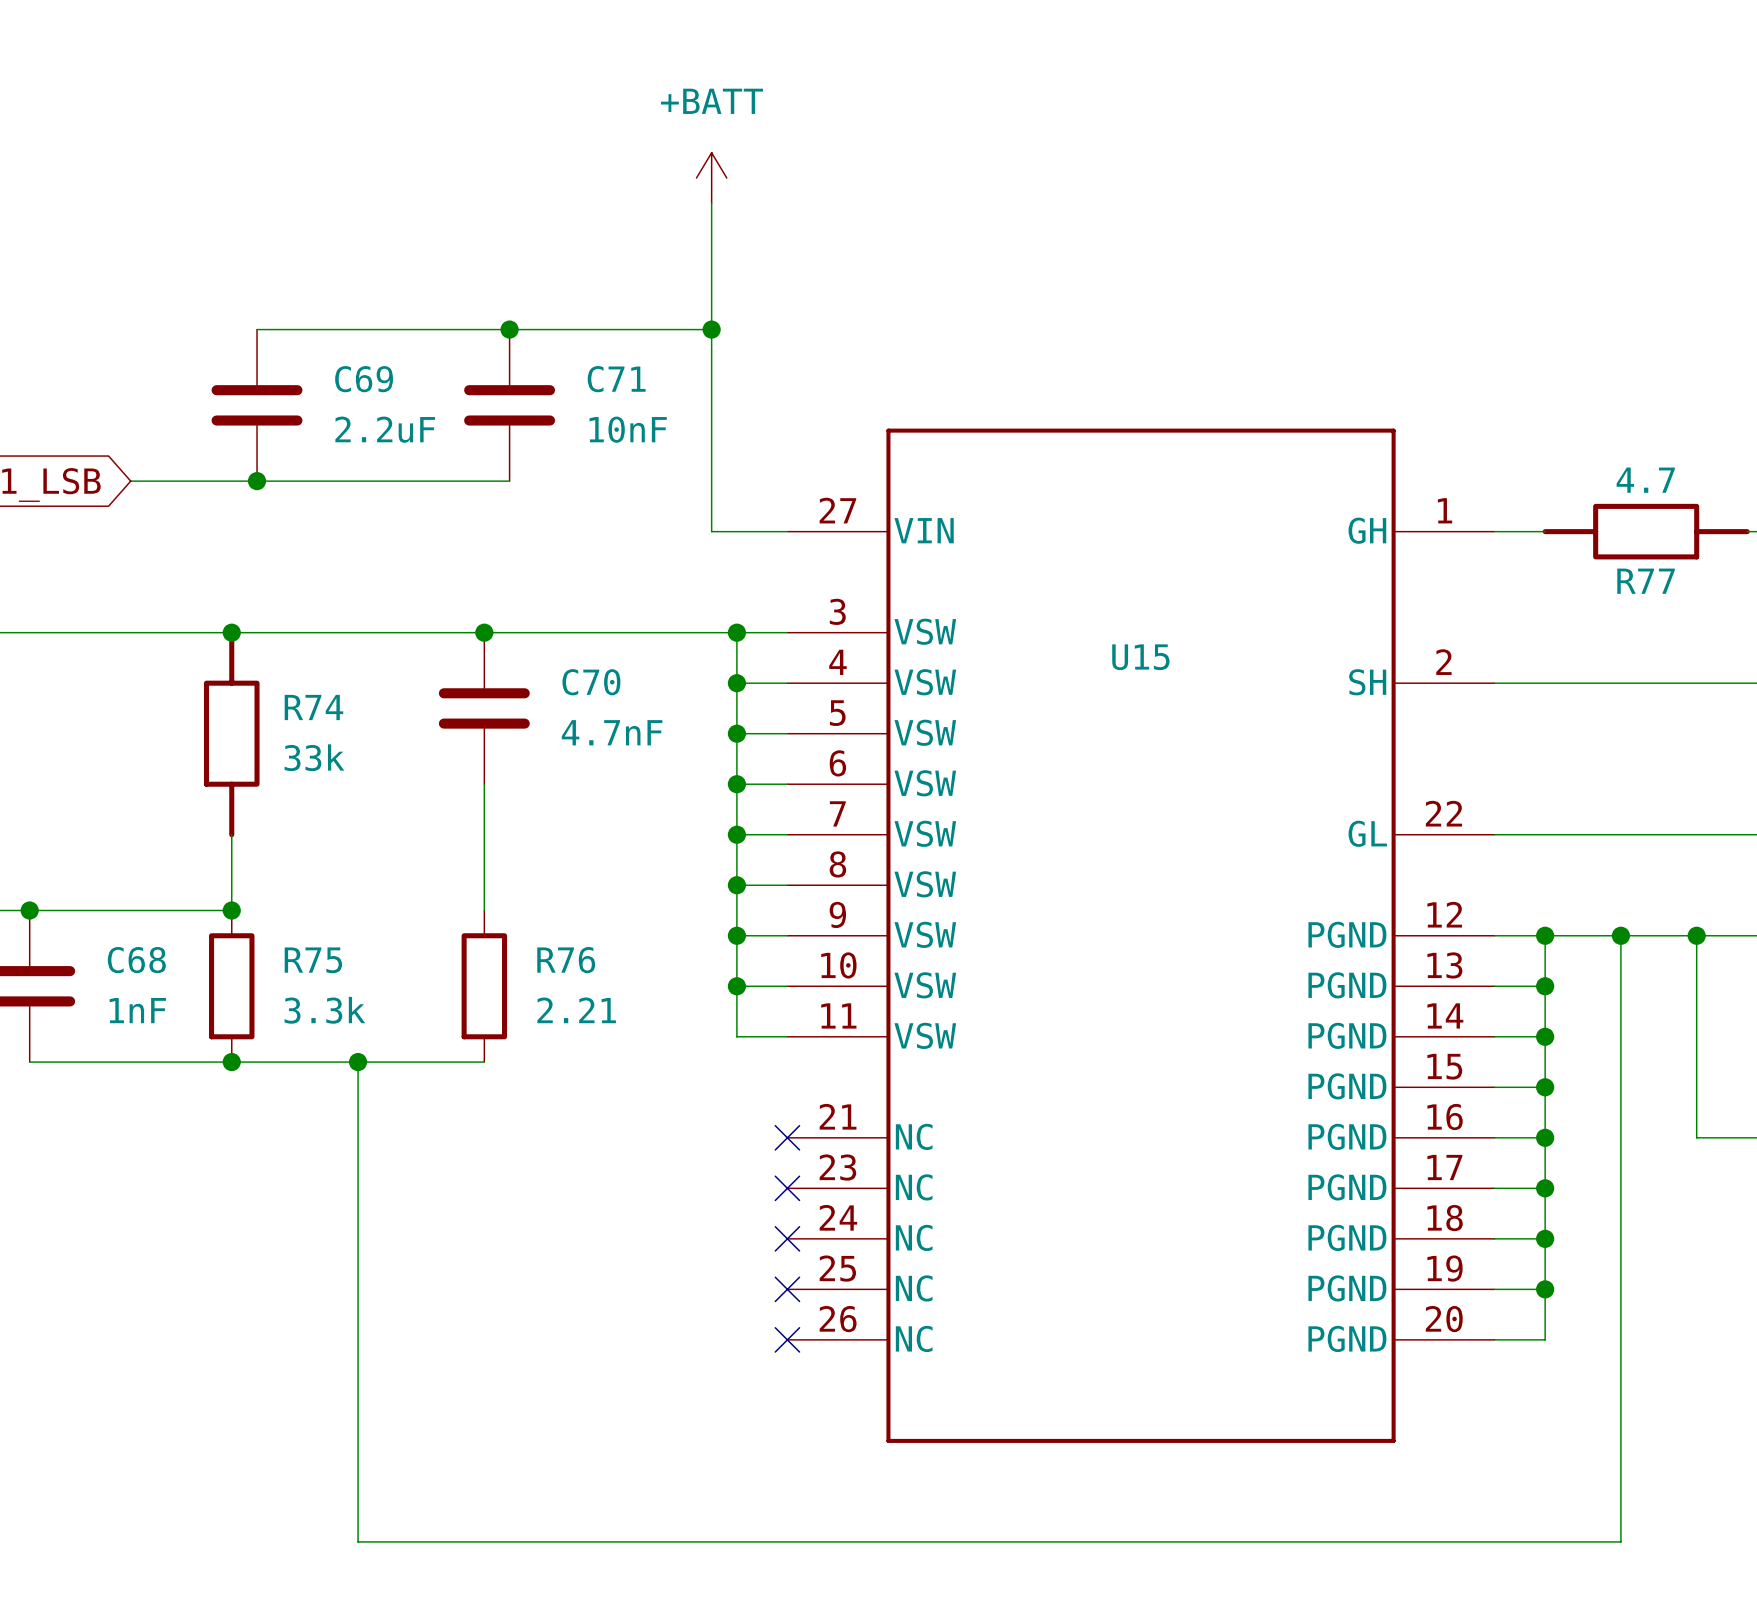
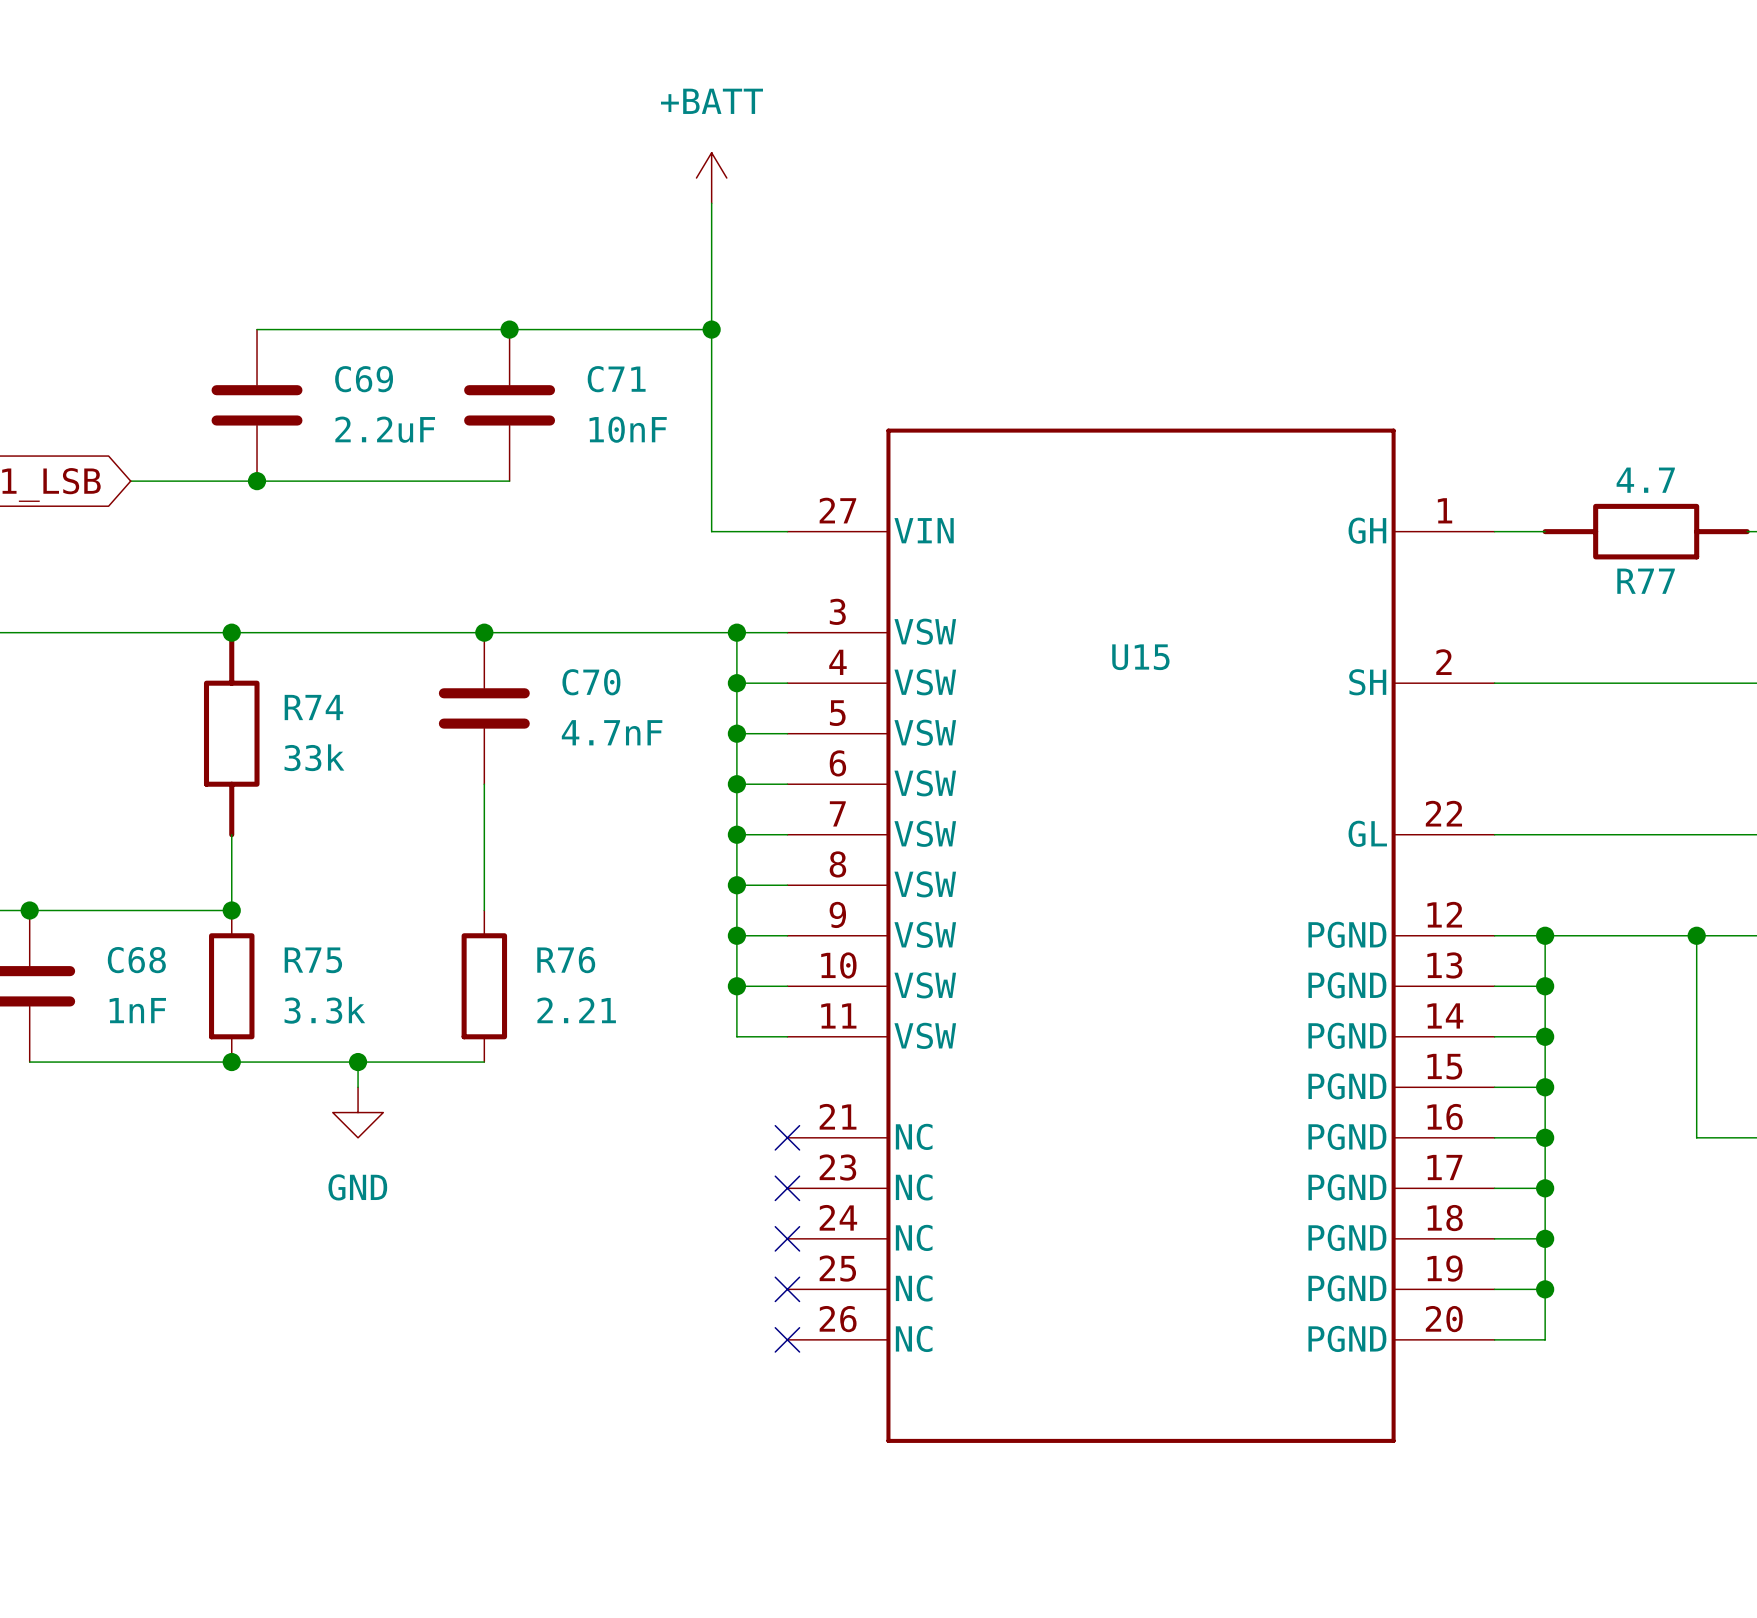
wire: (1620, 935) (1620, 1541) (358, 1541) (358, 1087) -> none
junction: (1620, 935) -> none
power symbol: none -> GND (358, 1112)

